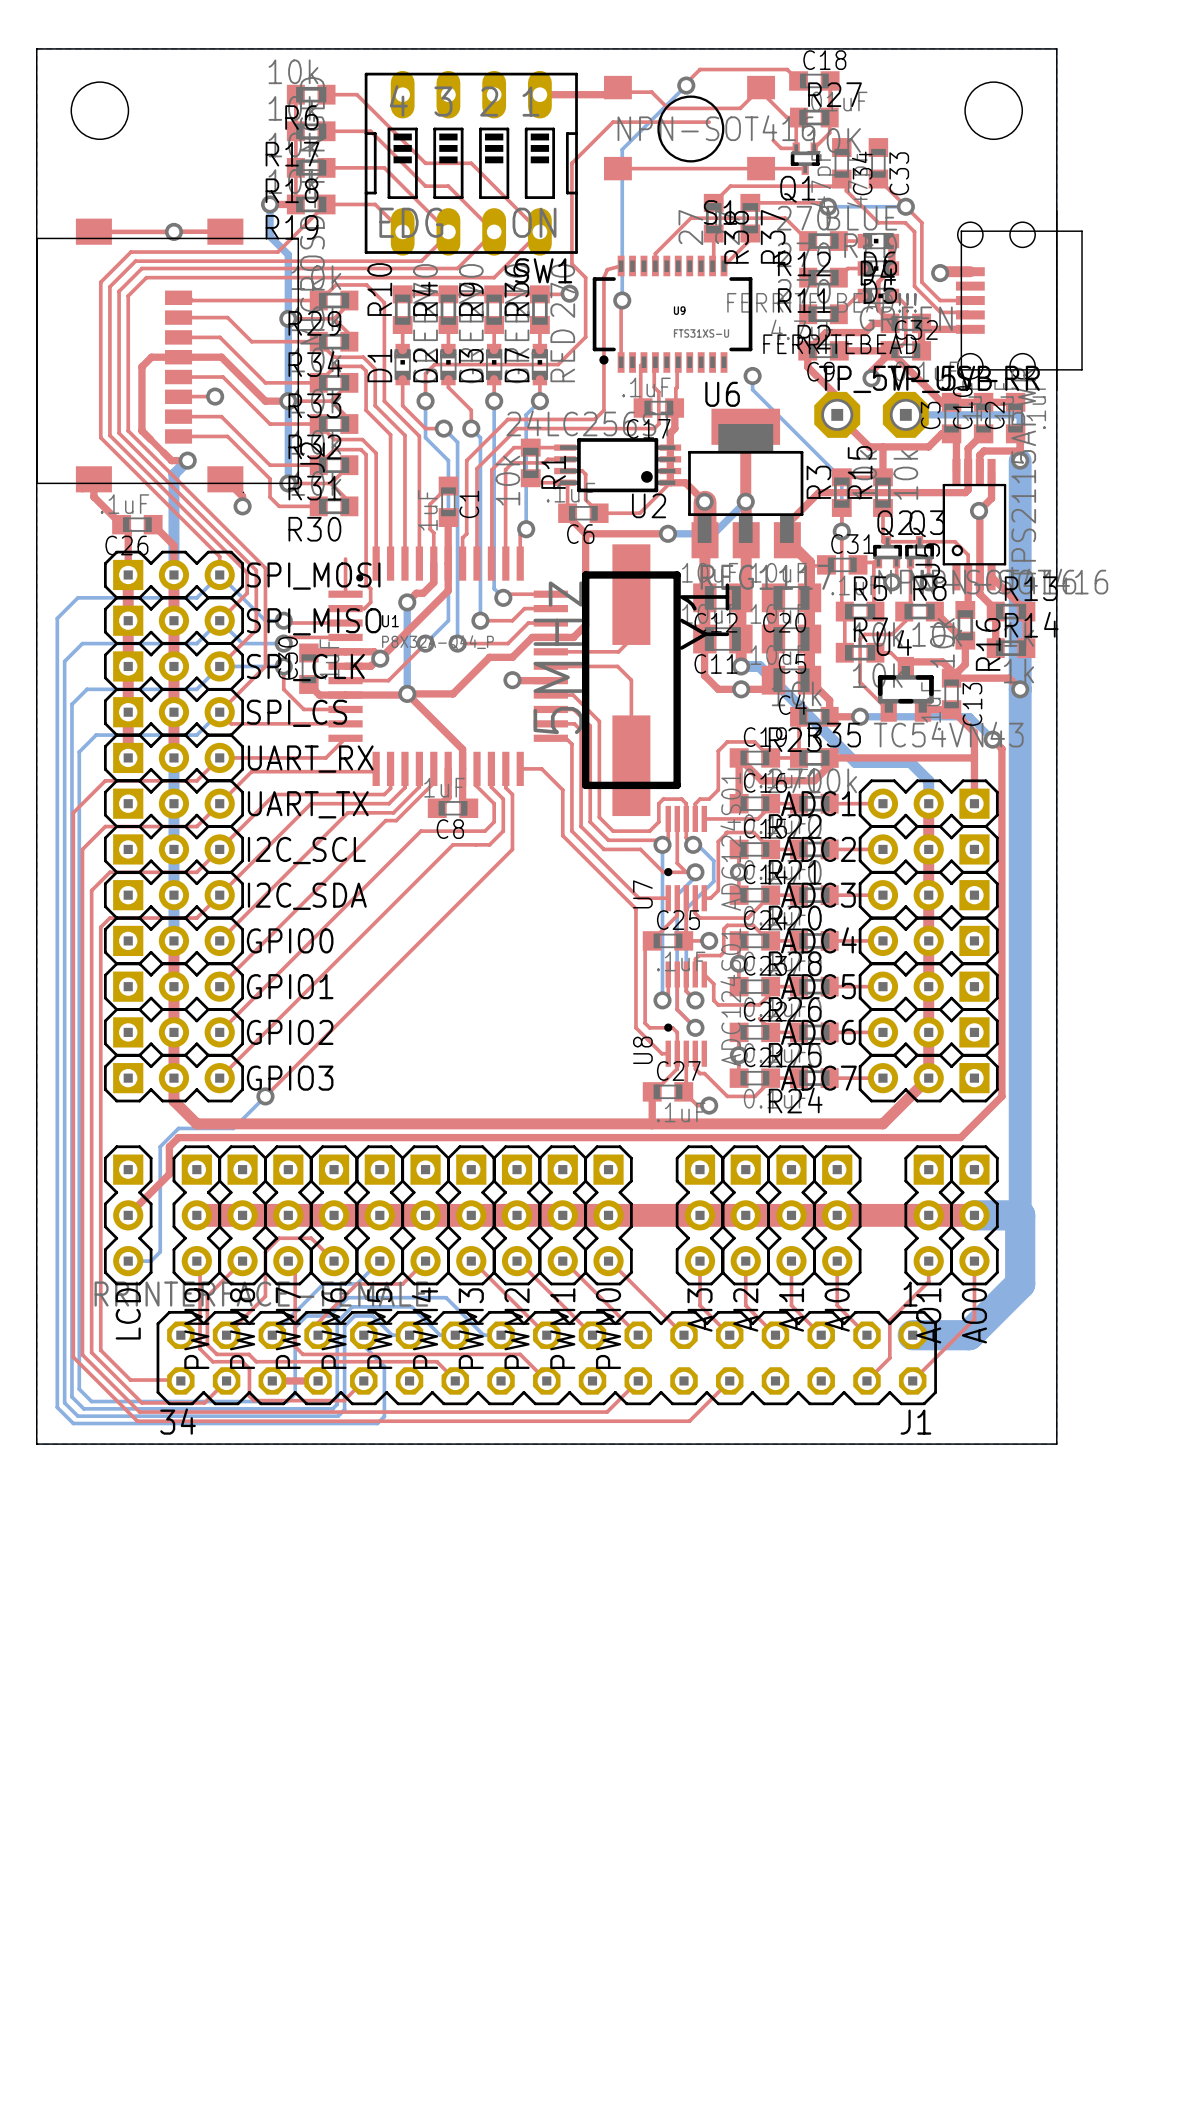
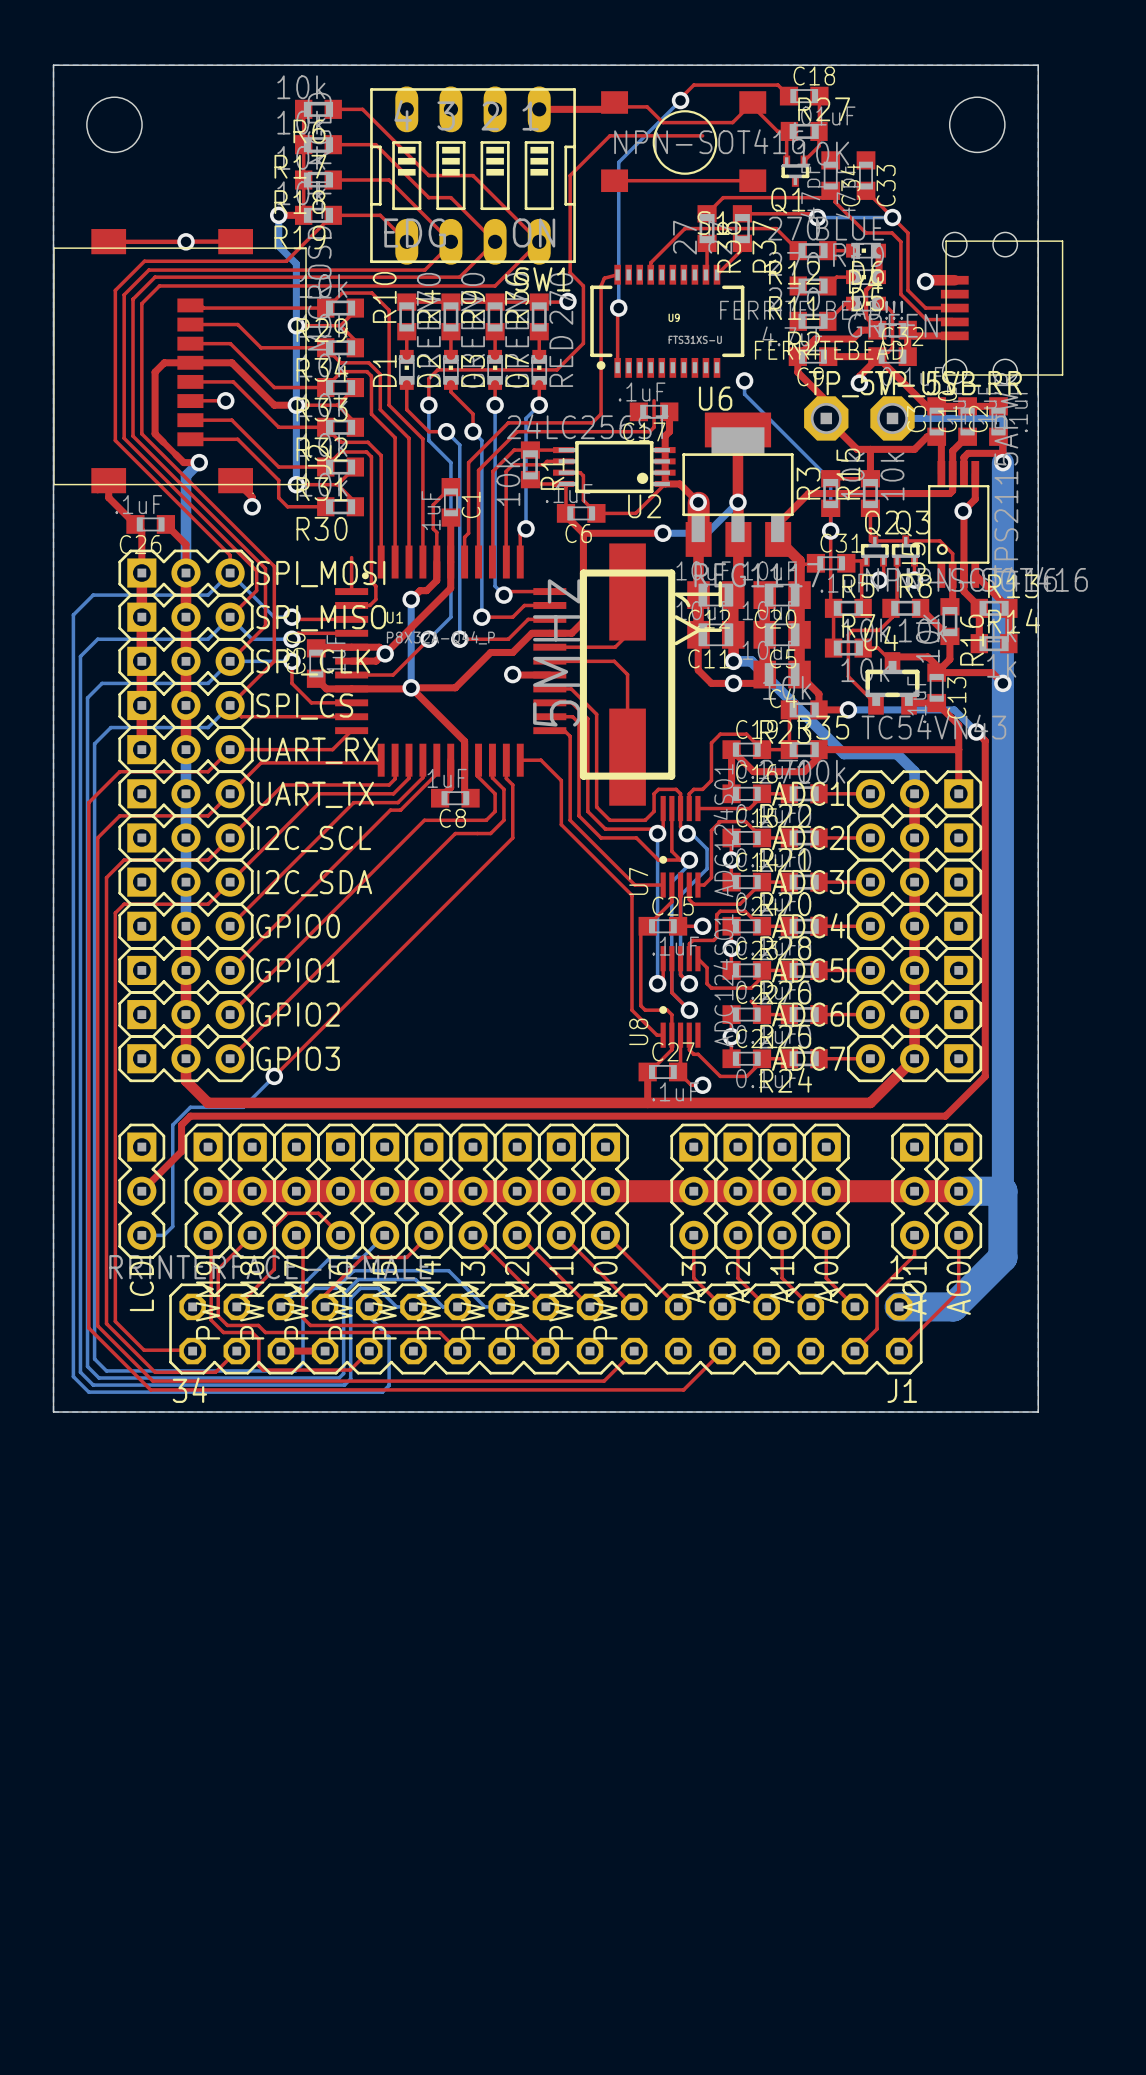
top track: (773, 140) (781, 148) (796, 148) -> none
top track: (755, 168) (805, 169) -> none
top track: (643, 362) (640, 365) (640, 405) -> none
top track: (655, 362) (654, 387) (658, 392) (658, 396) -> none
top track: (678, 362) (675, 406) -> none

